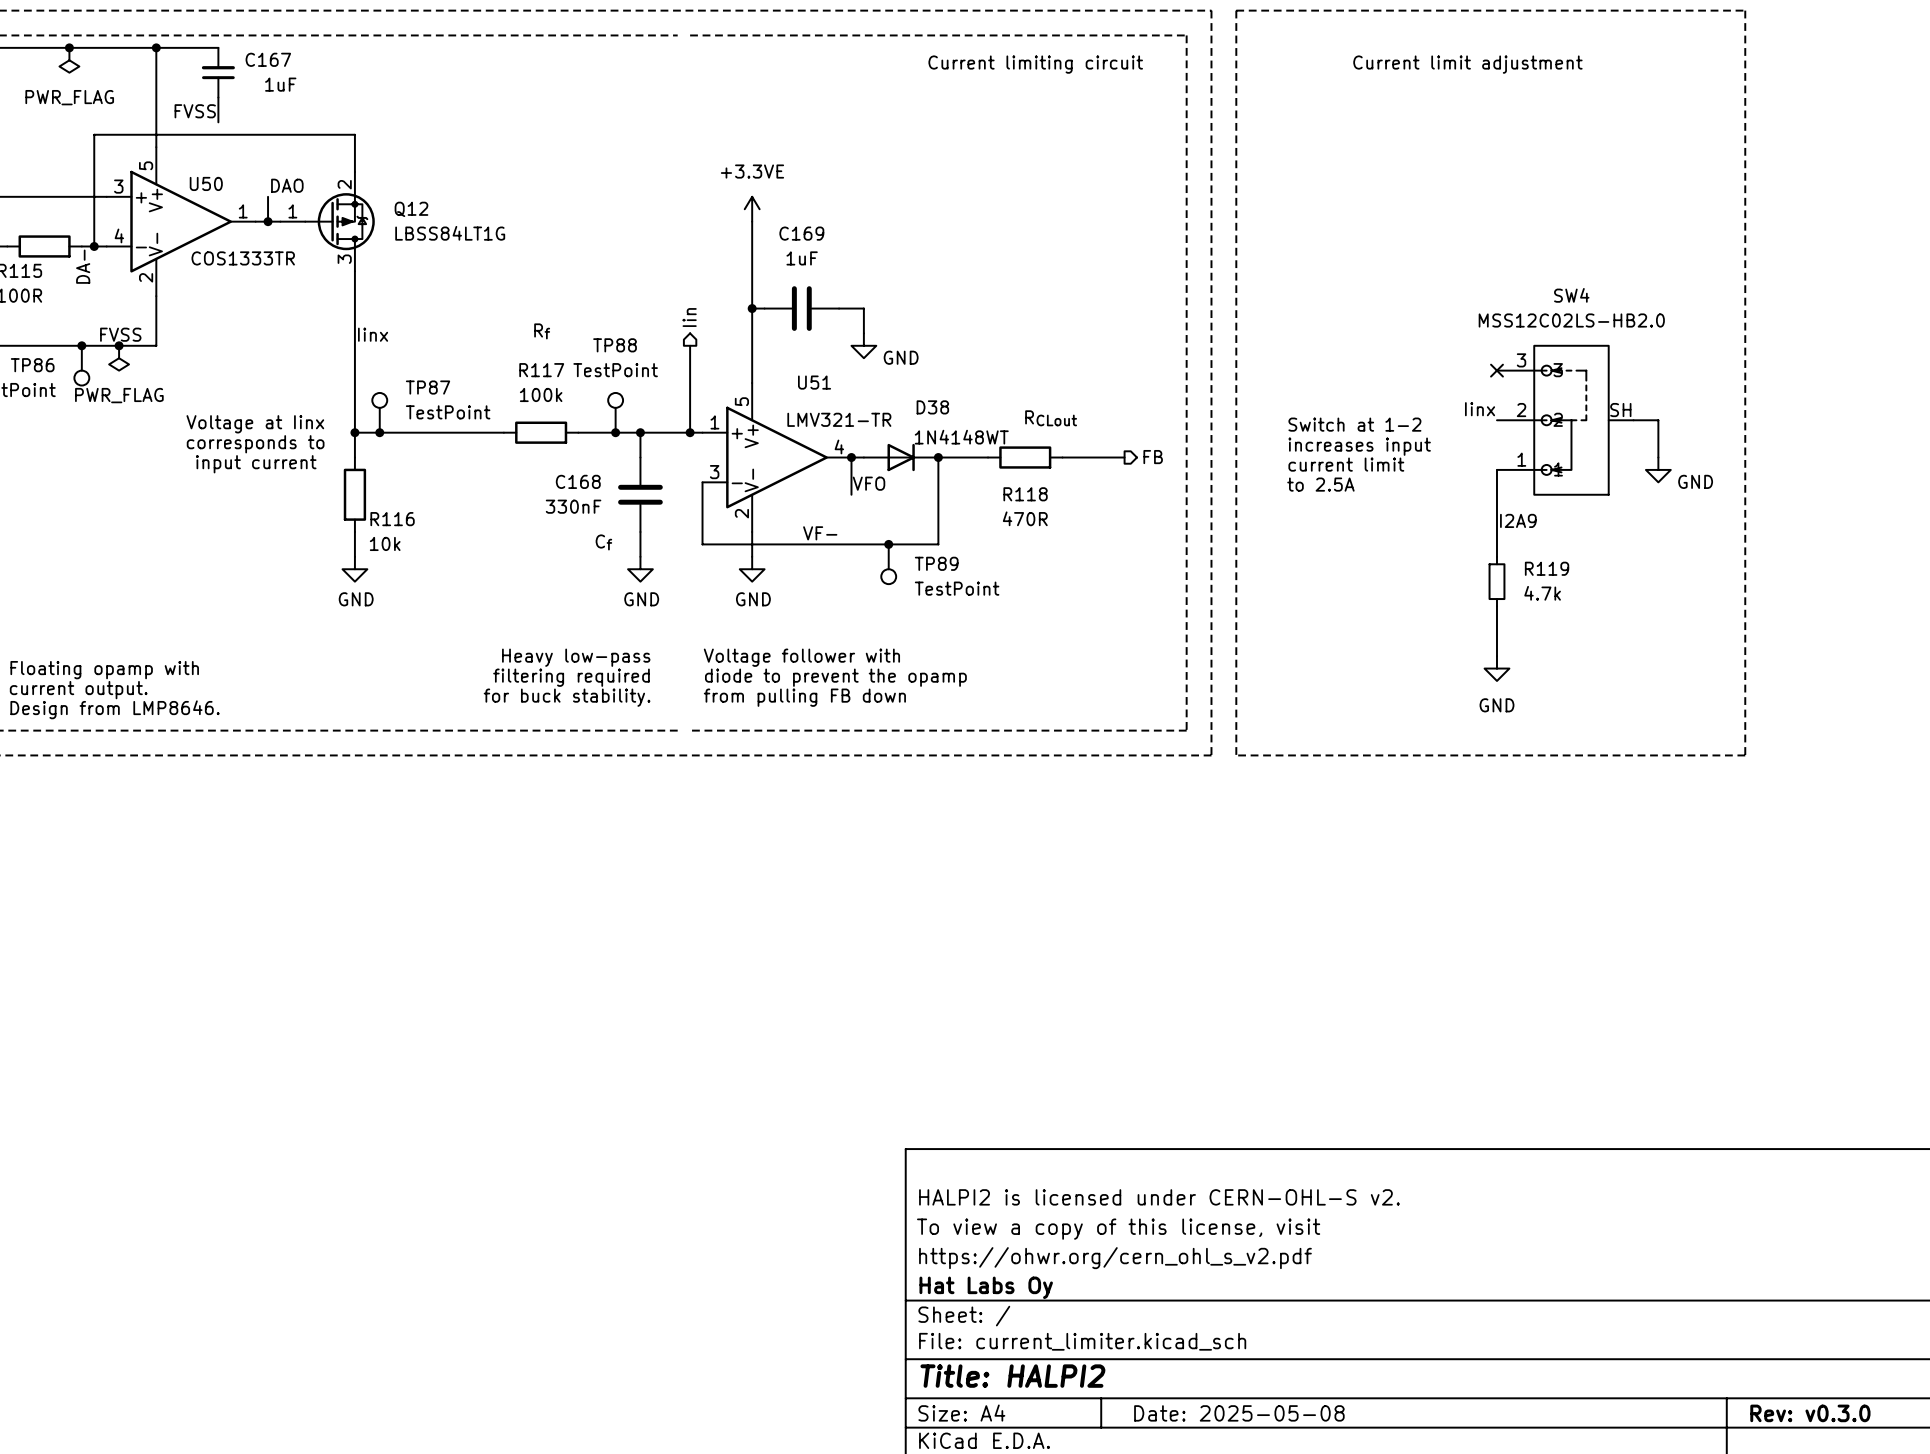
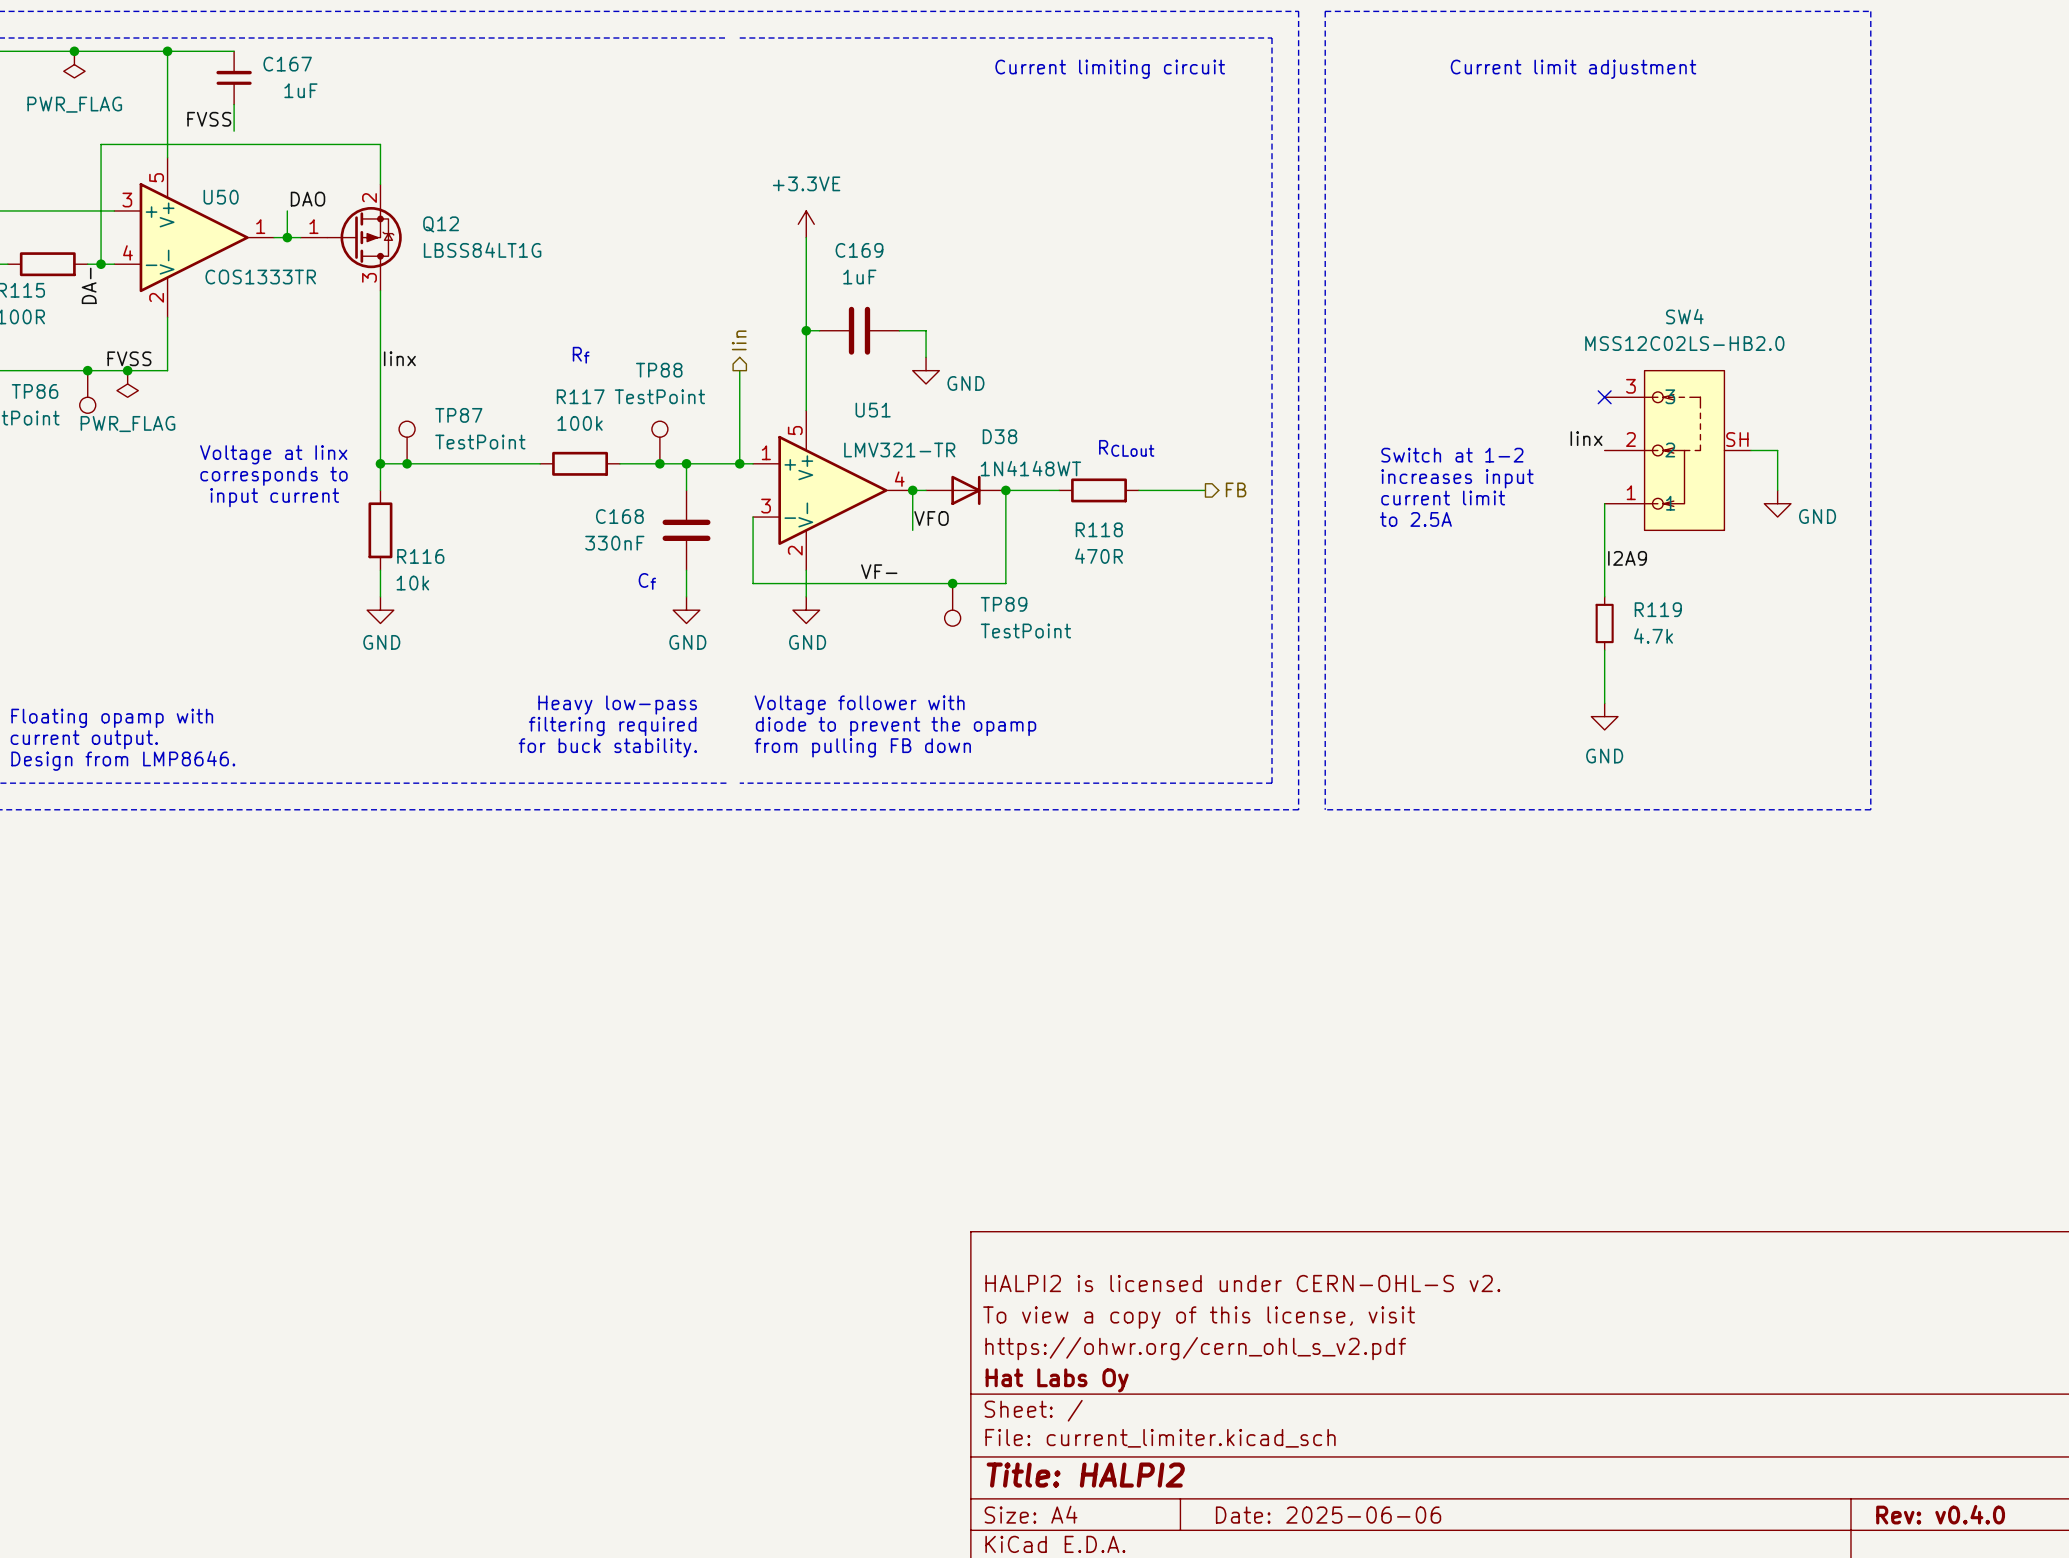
title block: Date: 2025-05-08 (1239, 1413) -> Date: 2025-06-06 (1328, 1515)
title block: Rev: v0.3.0 (1810, 1413) -> Rev: v0.4.0 (1940, 1514)

